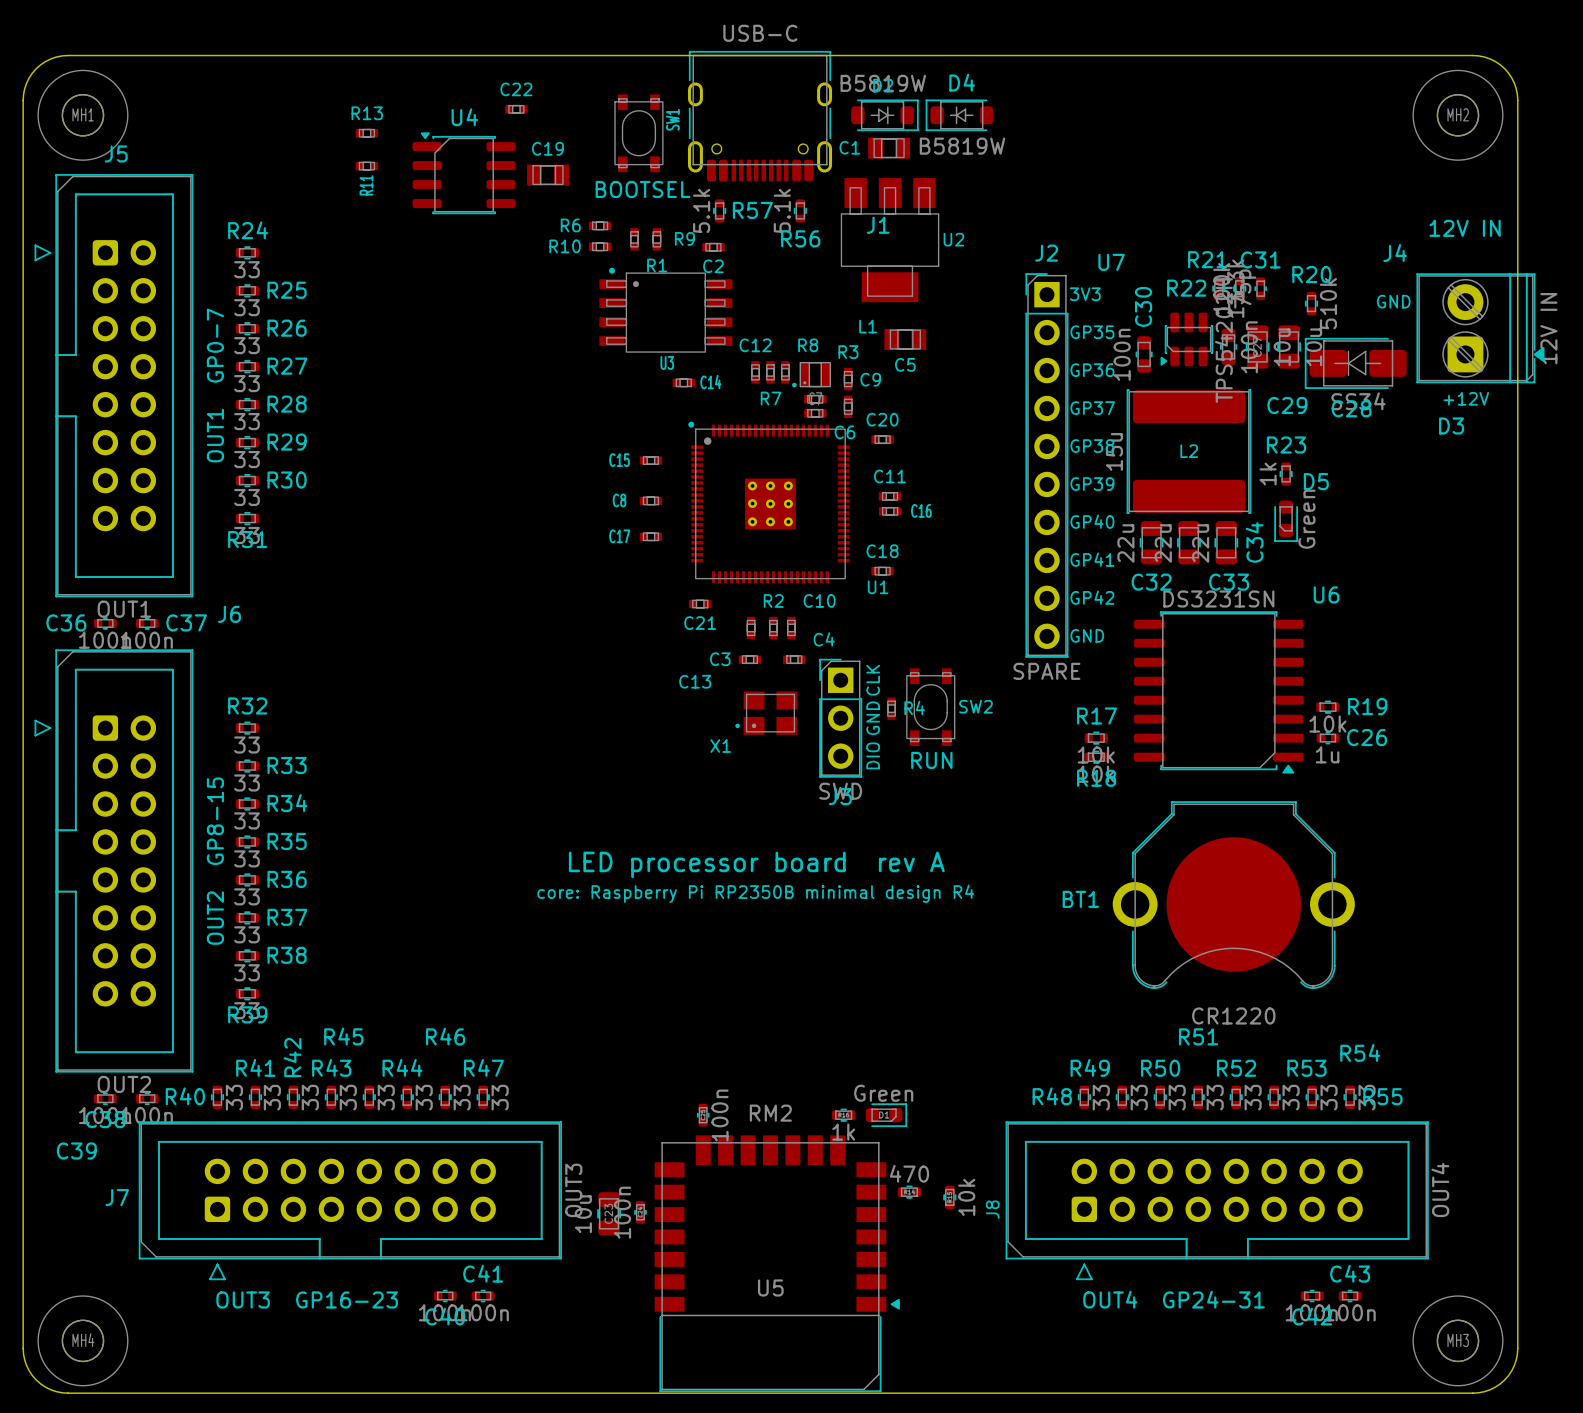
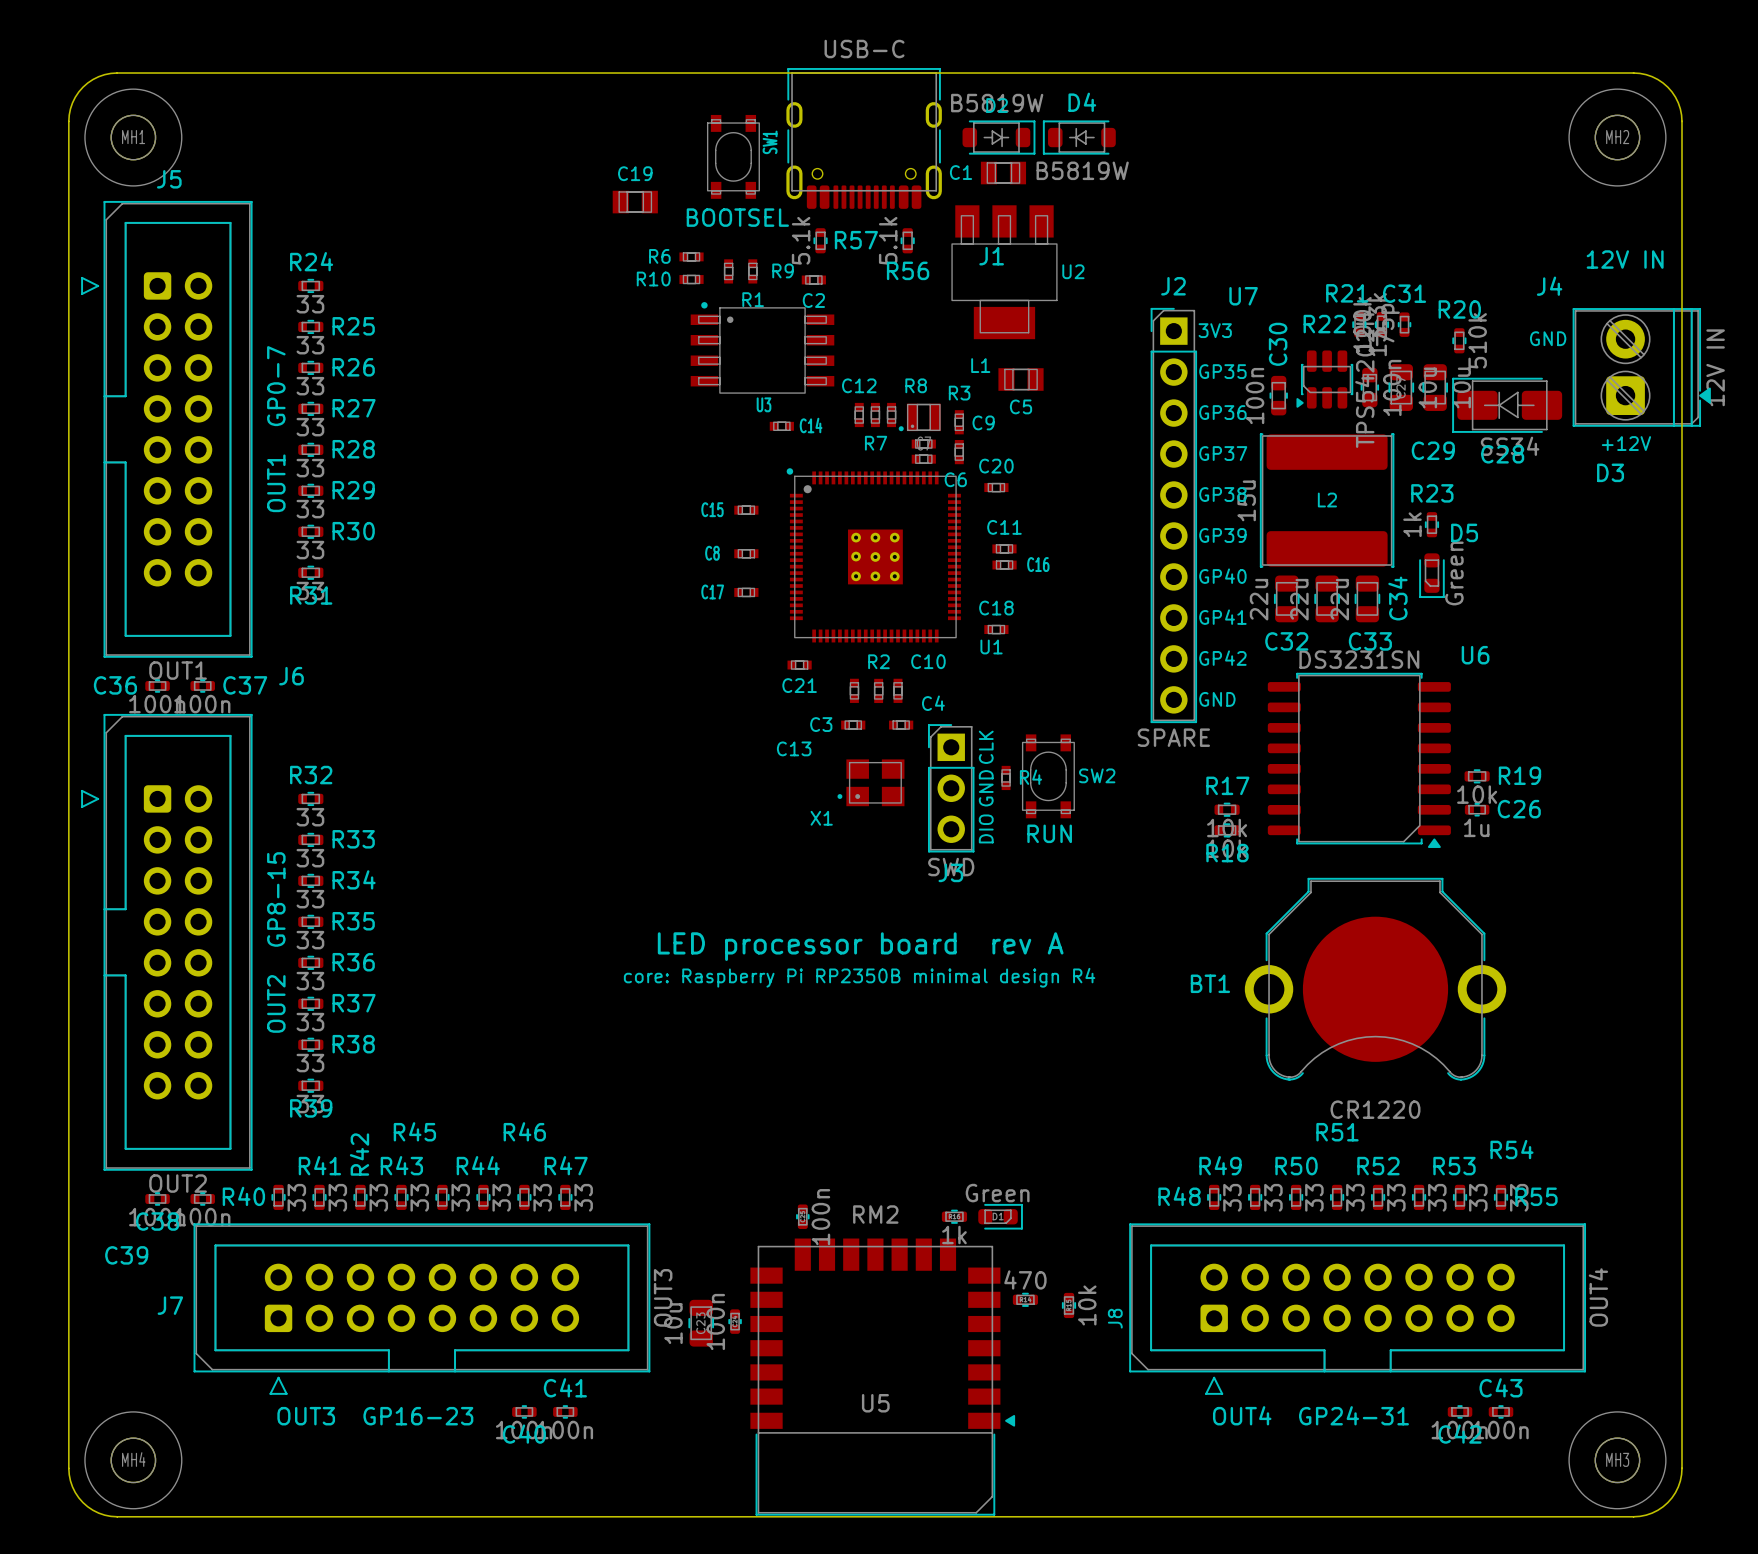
C22: (516, 109) -> none
R13: (366, 133) -> none
R11: (366, 166) -> none
U4: (464, 173) -> none

